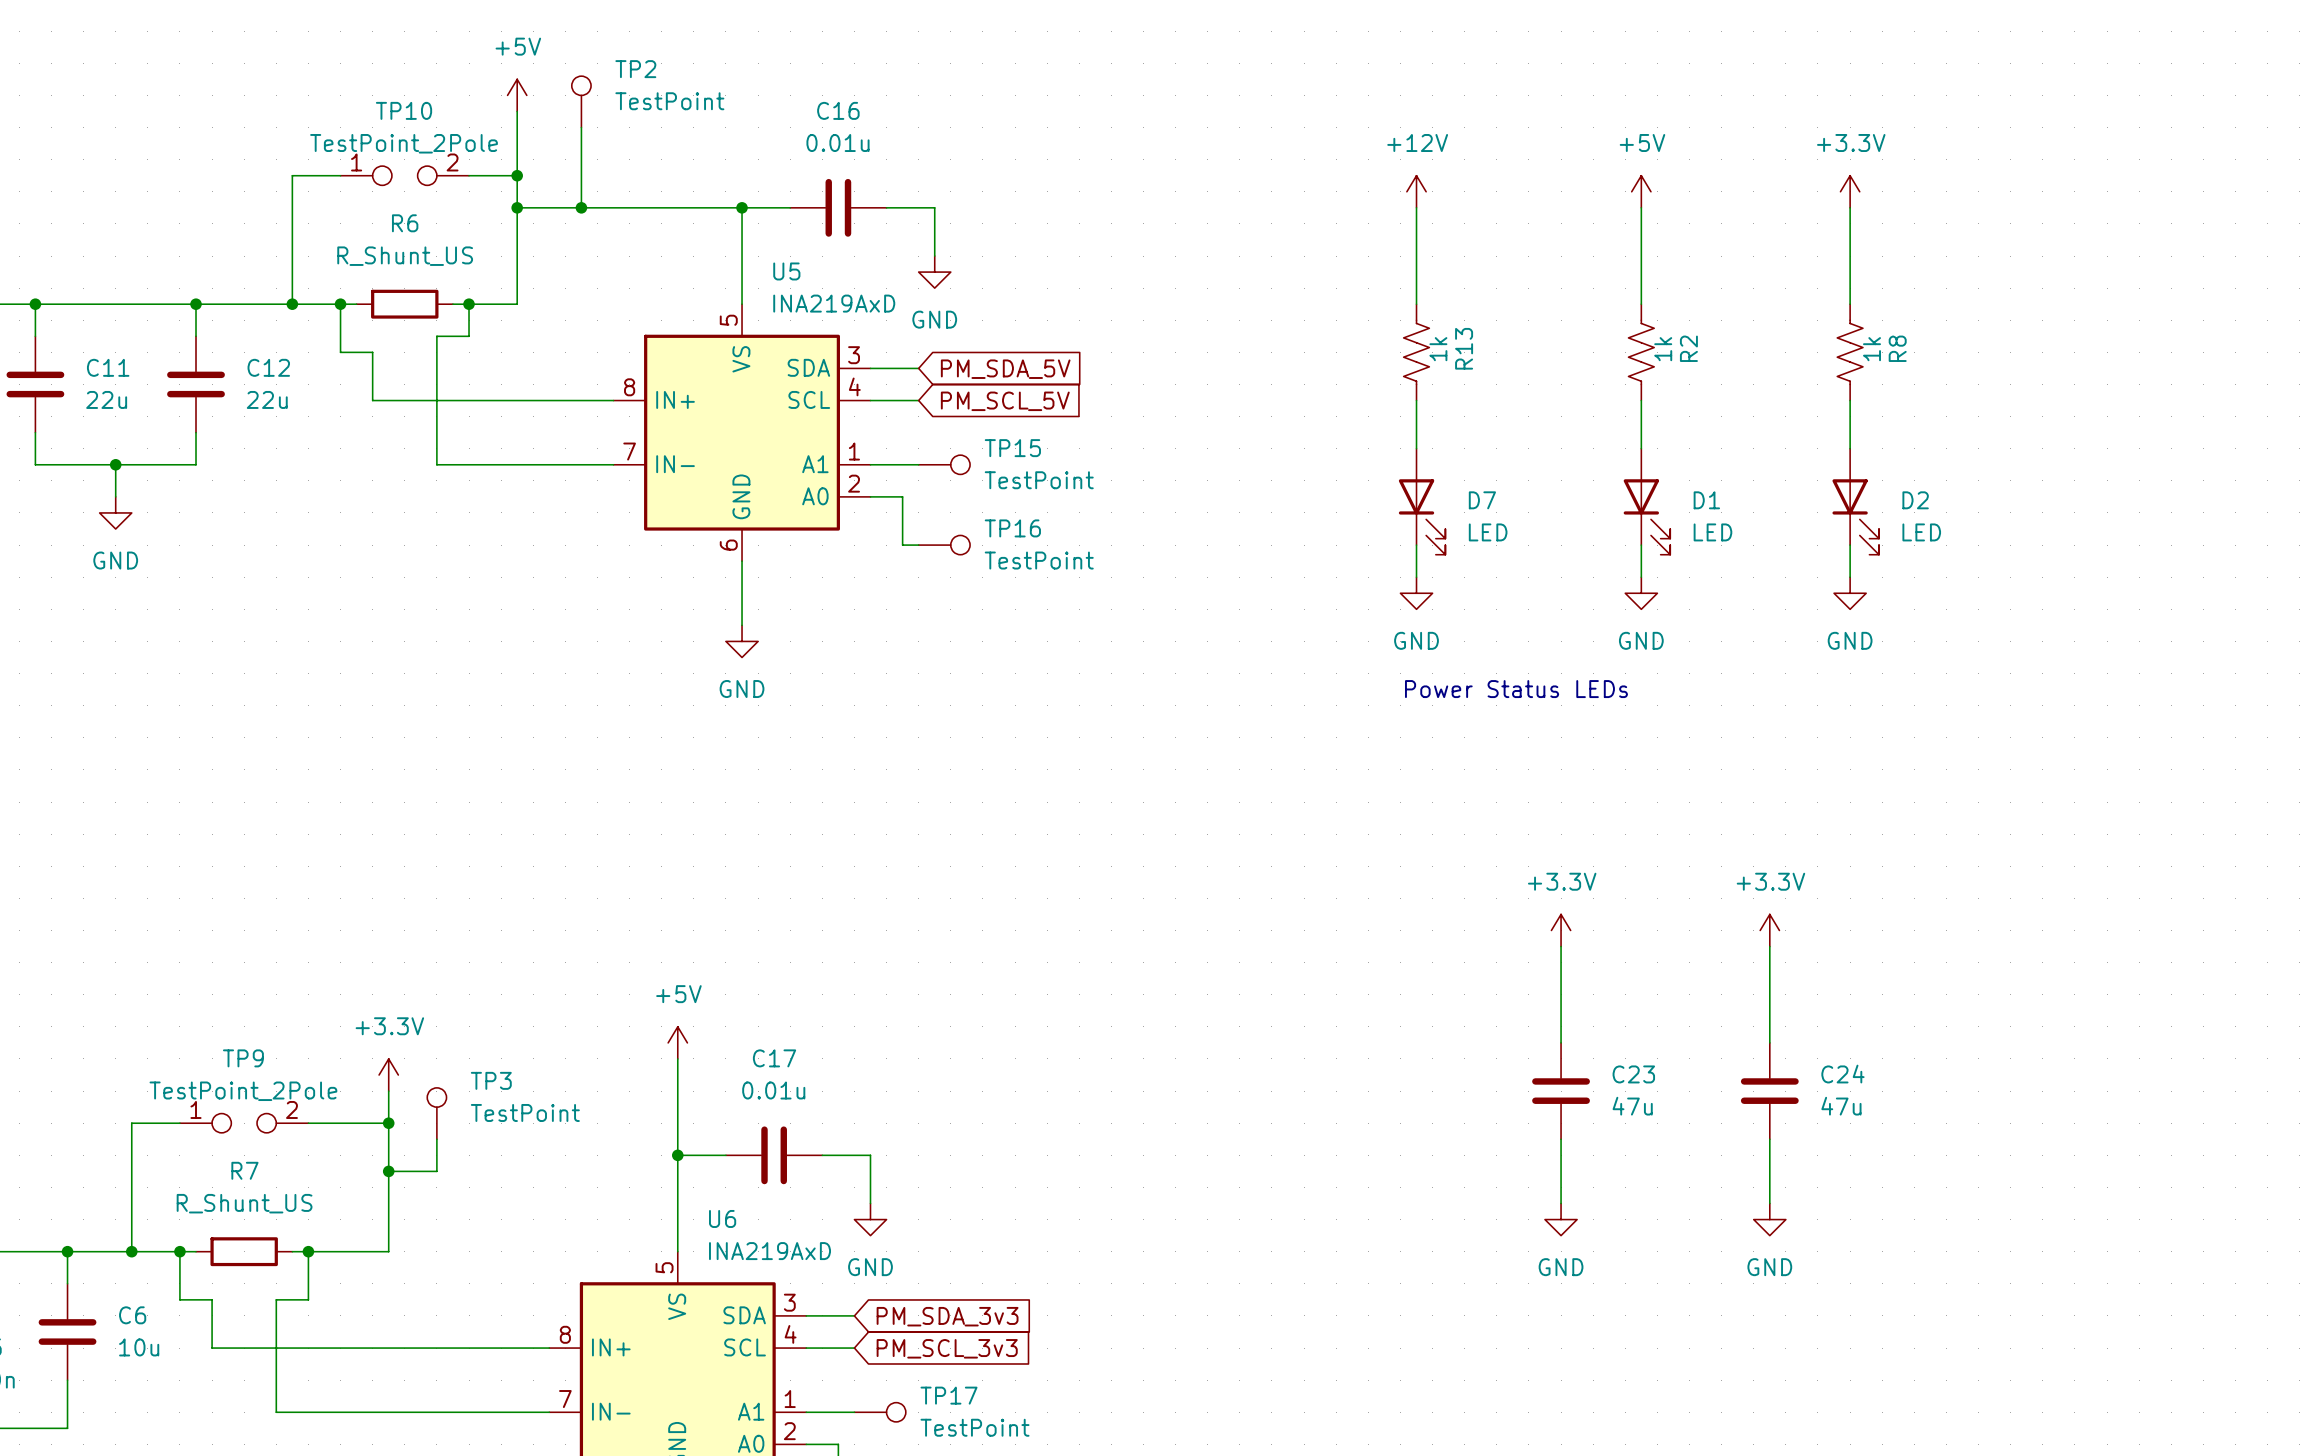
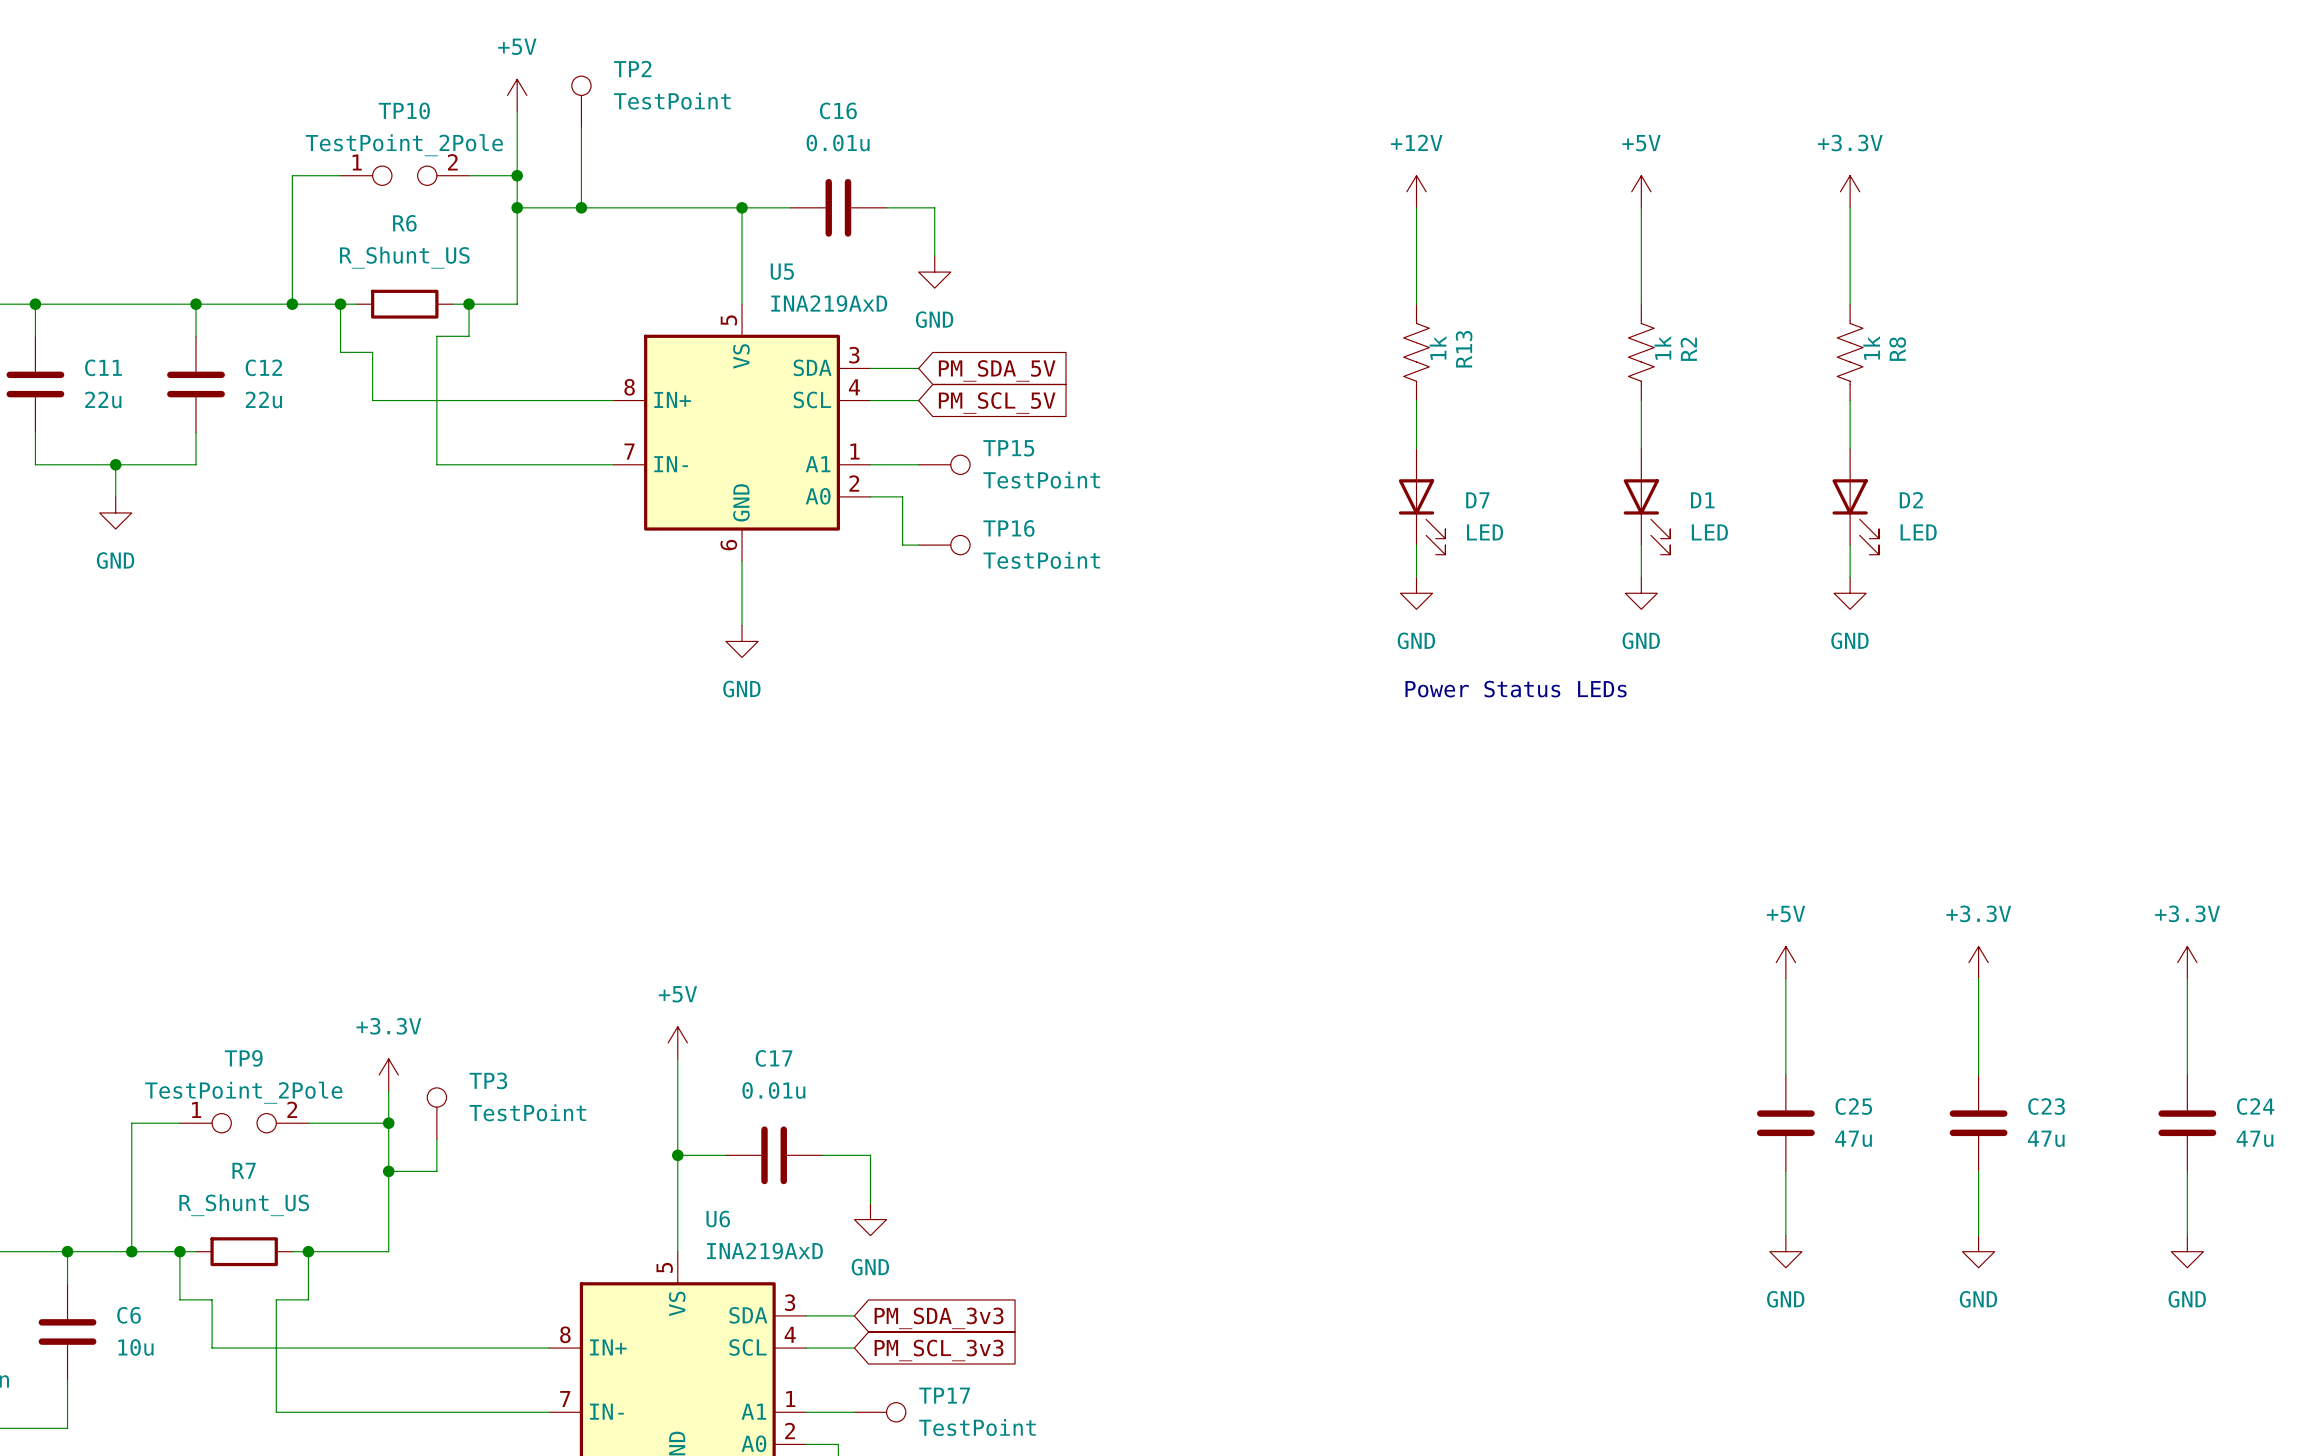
power symbol: +3.3V (1561, 930) -> none
power symbol: +3.3V (1769, 930) -> none
wire: (1561, 946) (1561, 1042) -> none
wire: (1769, 946) (1769, 1042) -> (1785, 978) (1785, 1075)
power symbol: none -> +5V (1785, 962)
power symbol: none -> +3.3V (1978, 962)
power symbol: none -> +3.3V (2187, 962)
wire: none -> (1978, 978) (1978, 1075)
wire: none -> (2187, 978) (2187, 1075)
C23 position: (1561, 1091) -> (1978, 1123)
C24 position: (1769, 1091) -> (2187, 1123)
C25: none -> 47u (1785, 1123)
wire: (1561, 1139) (1561, 1203) -> none
wire: (1769, 1139) (1769, 1203) -> (1785, 1171) (1785, 1235)
wire: none -> (1978, 1171) (1978, 1235)
wire: none -> (2187, 1171) (2187, 1235)
power symbol: GND (1561, 1219) -> none
power symbol position: GND (1769, 1219) -> GND (1785, 1251)
power symbol: none -> GND (1978, 1251)
power symbol: none -> GND (2187, 1251)

